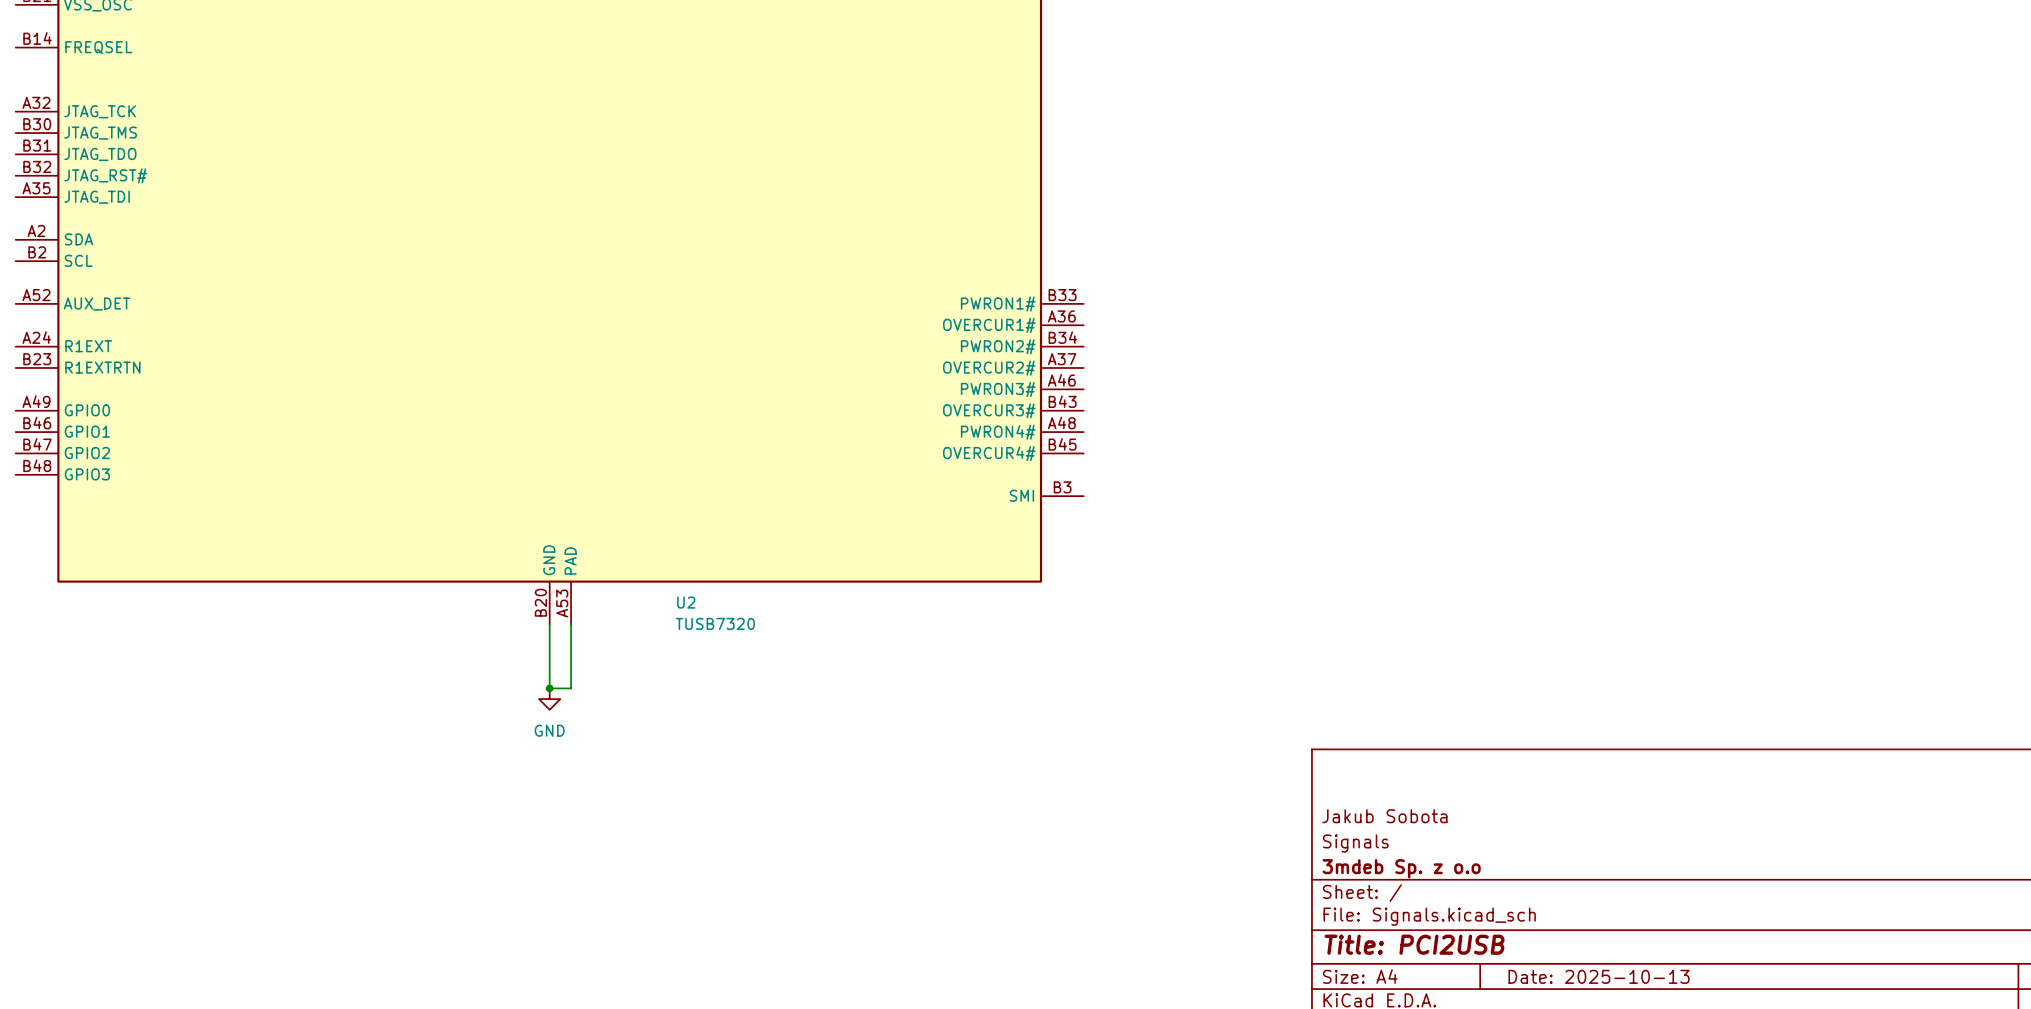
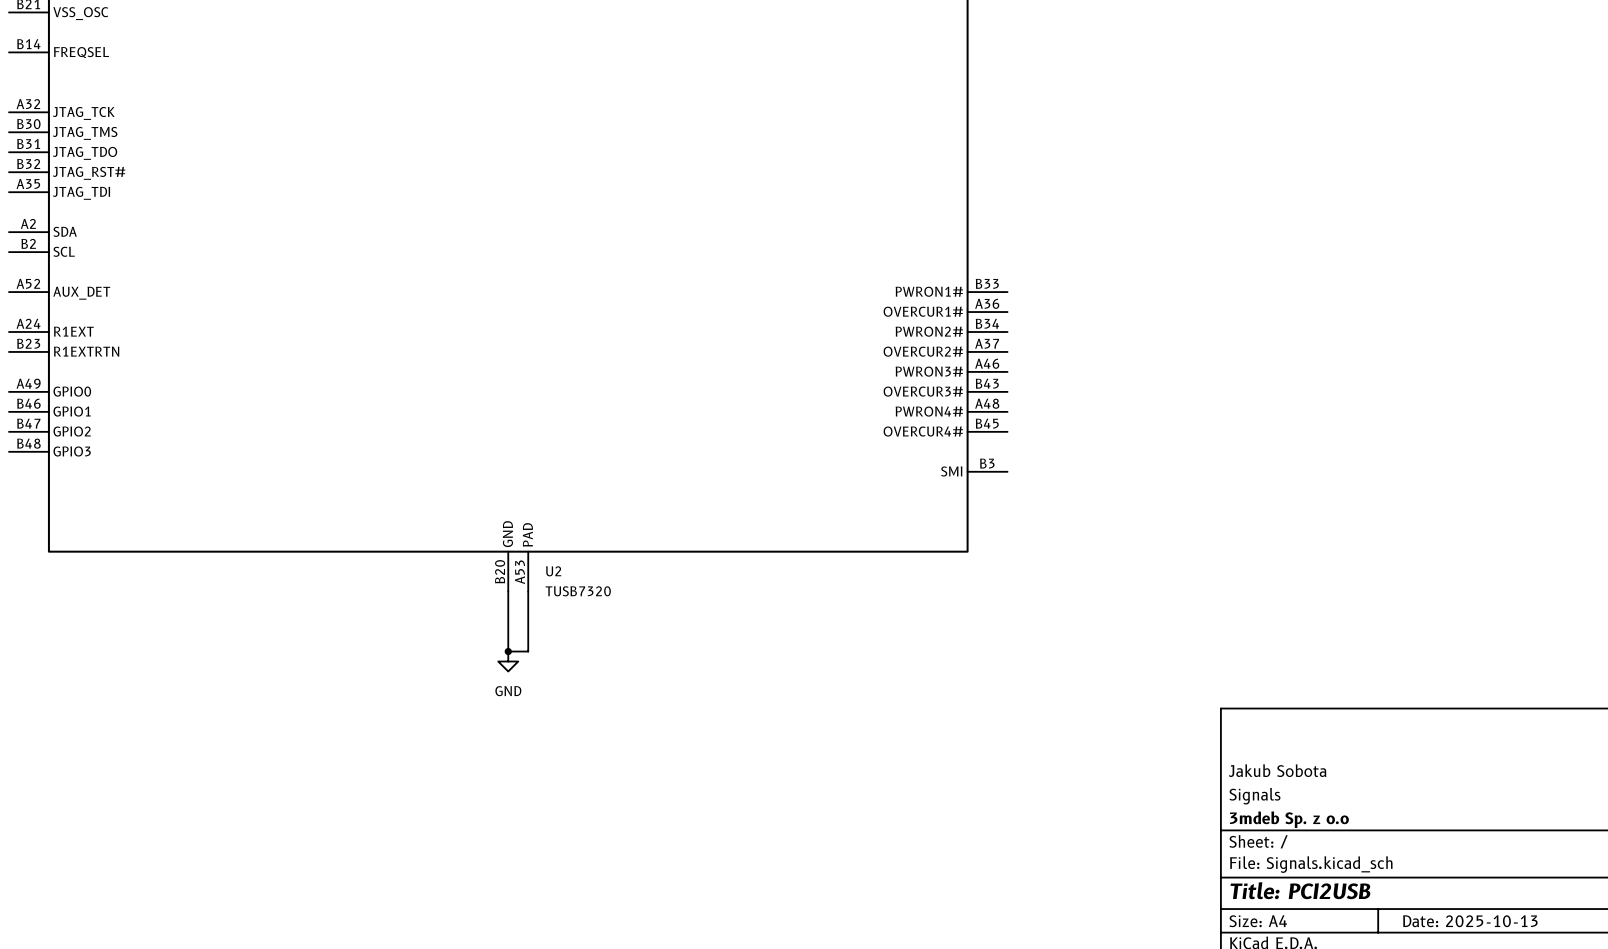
U2 name position: U2 (686, 602) -> U2 (553, 571)
U2 value position: TUSB7320 (715, 623) -> TUSB7320 (578, 591)

